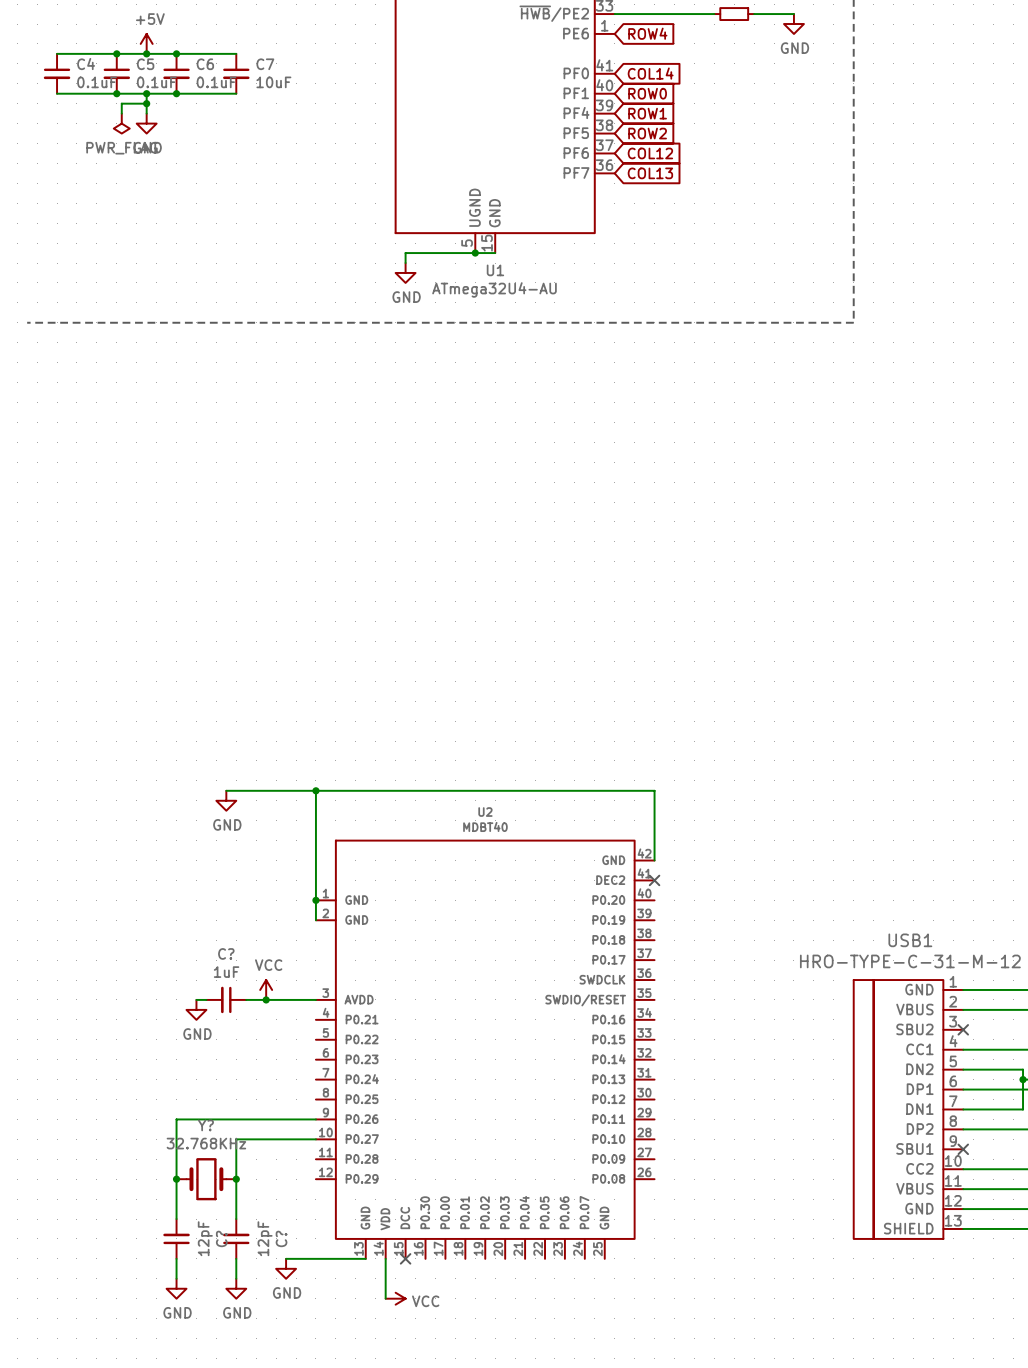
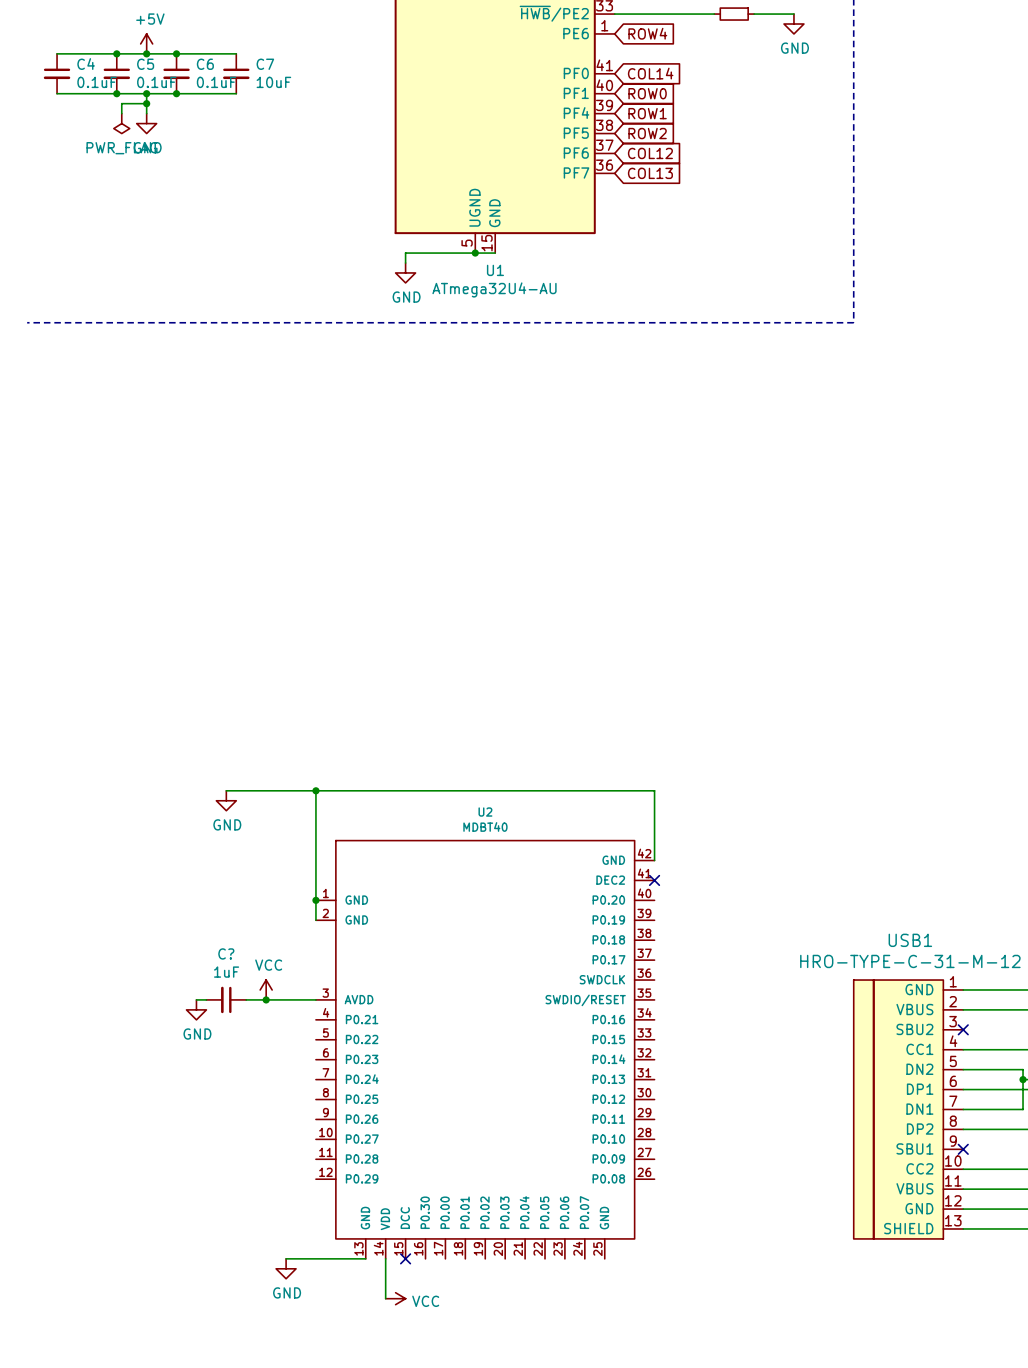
wire: (315, 1119) (176, 1119) (176, 1219) -> none
wire: (315, 1139) (236, 1139) (236, 1219) -> none
junction: (176, 1179) -> none
Y?: 32.768KHz (206, 1179) -> none
junction: (236, 1179) -> none
C?: 12pF (176, 1238) -> none
C?: 12pF (236, 1238) -> none
wire: (176, 1258) (176, 1278) -> none
wire: (236, 1258) (236, 1278) -> none
power symbol: GND (176, 1288) -> none
power symbol: GND (236, 1288) -> none

